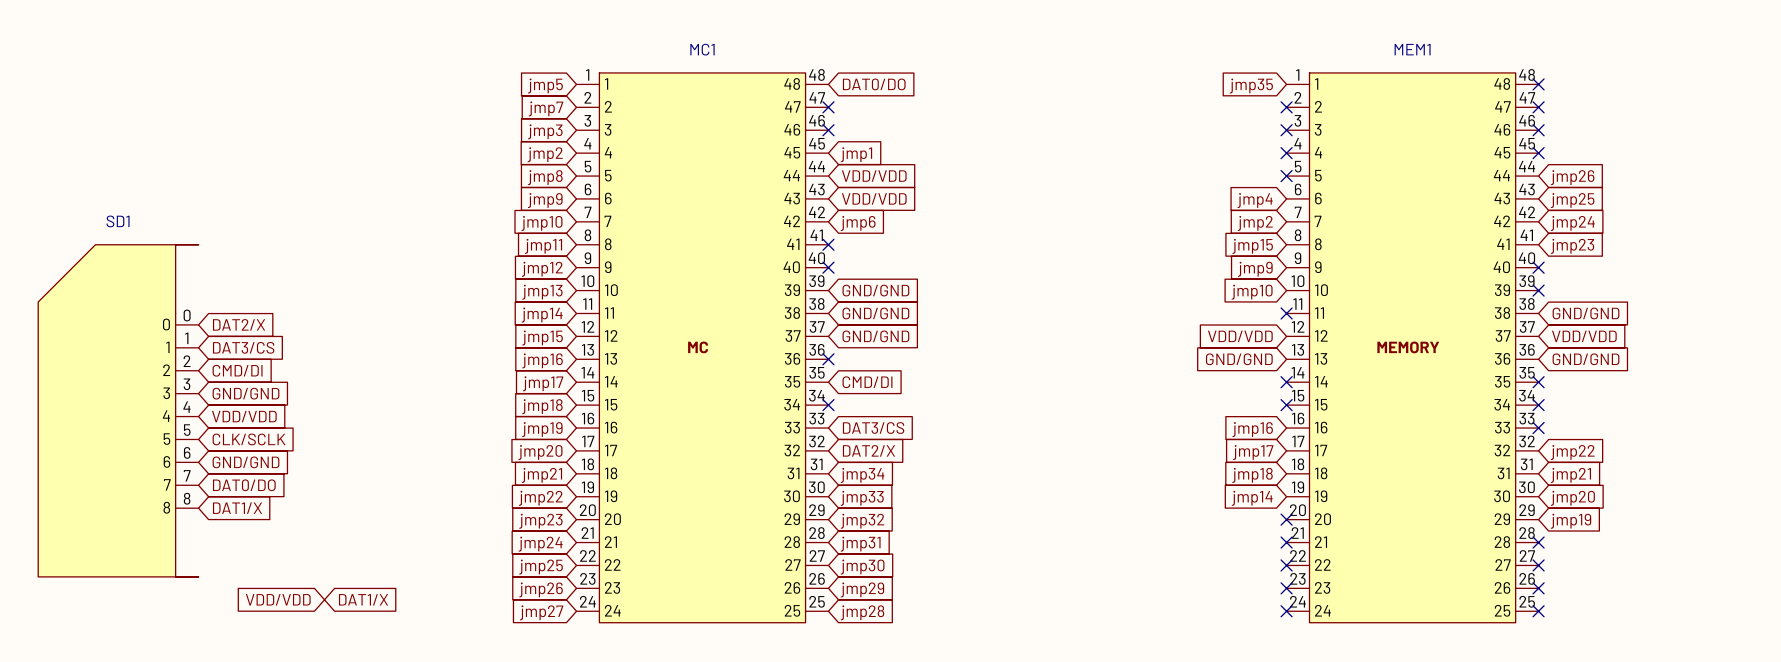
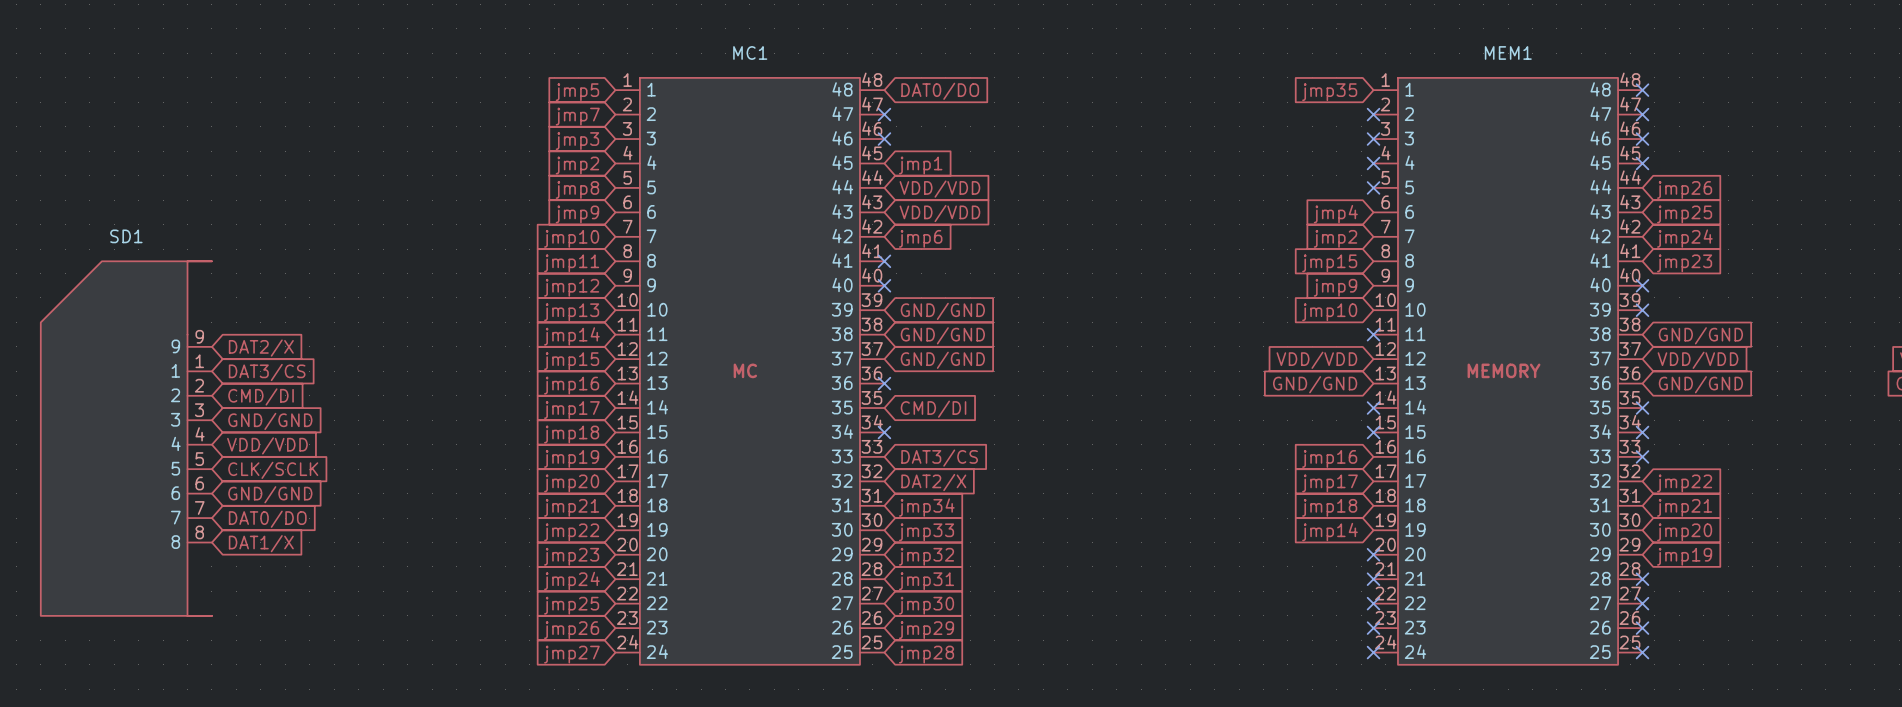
SD1 pin number: 0 (187, 315) -> 9 (199, 336)
SD1 pin name: 0 (166, 324) -> 9 (175, 346)
global label: VDD/VDD (278, 599) -> none
global label: DAT1/X (363, 599) -> none

